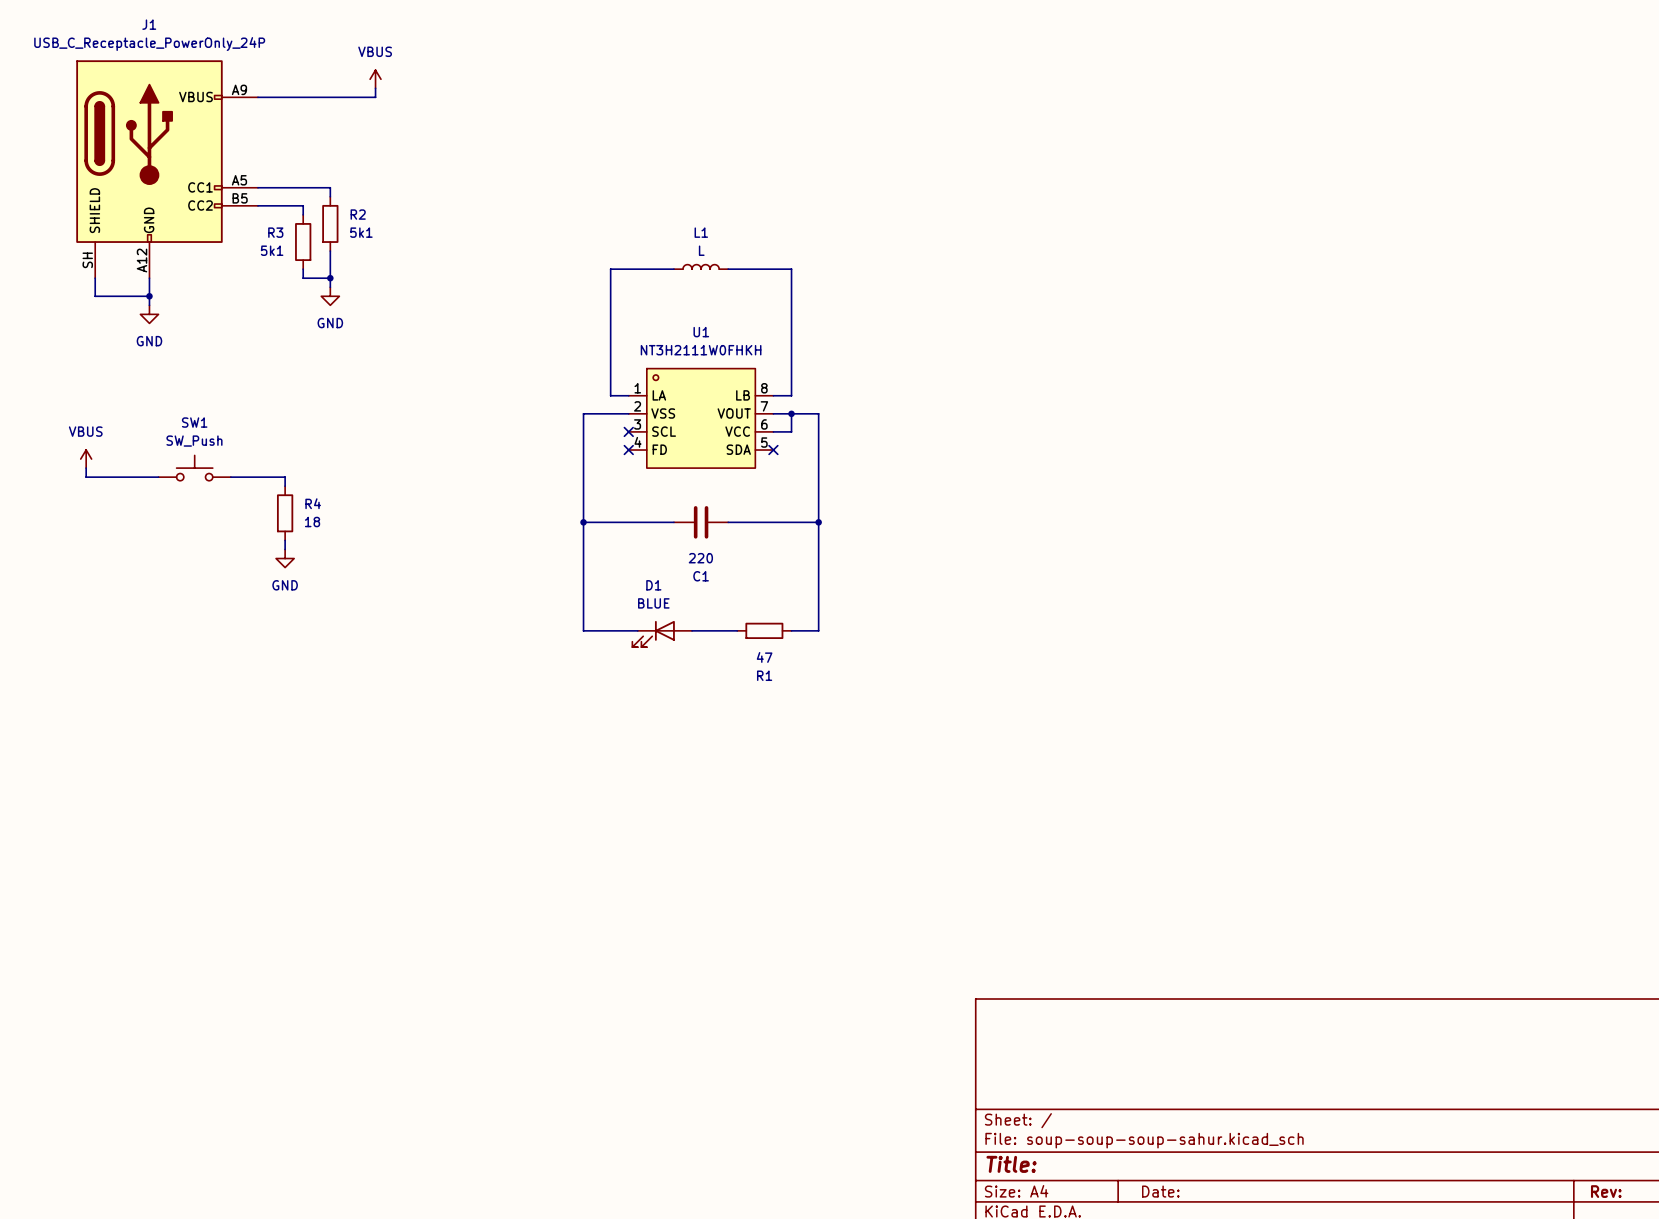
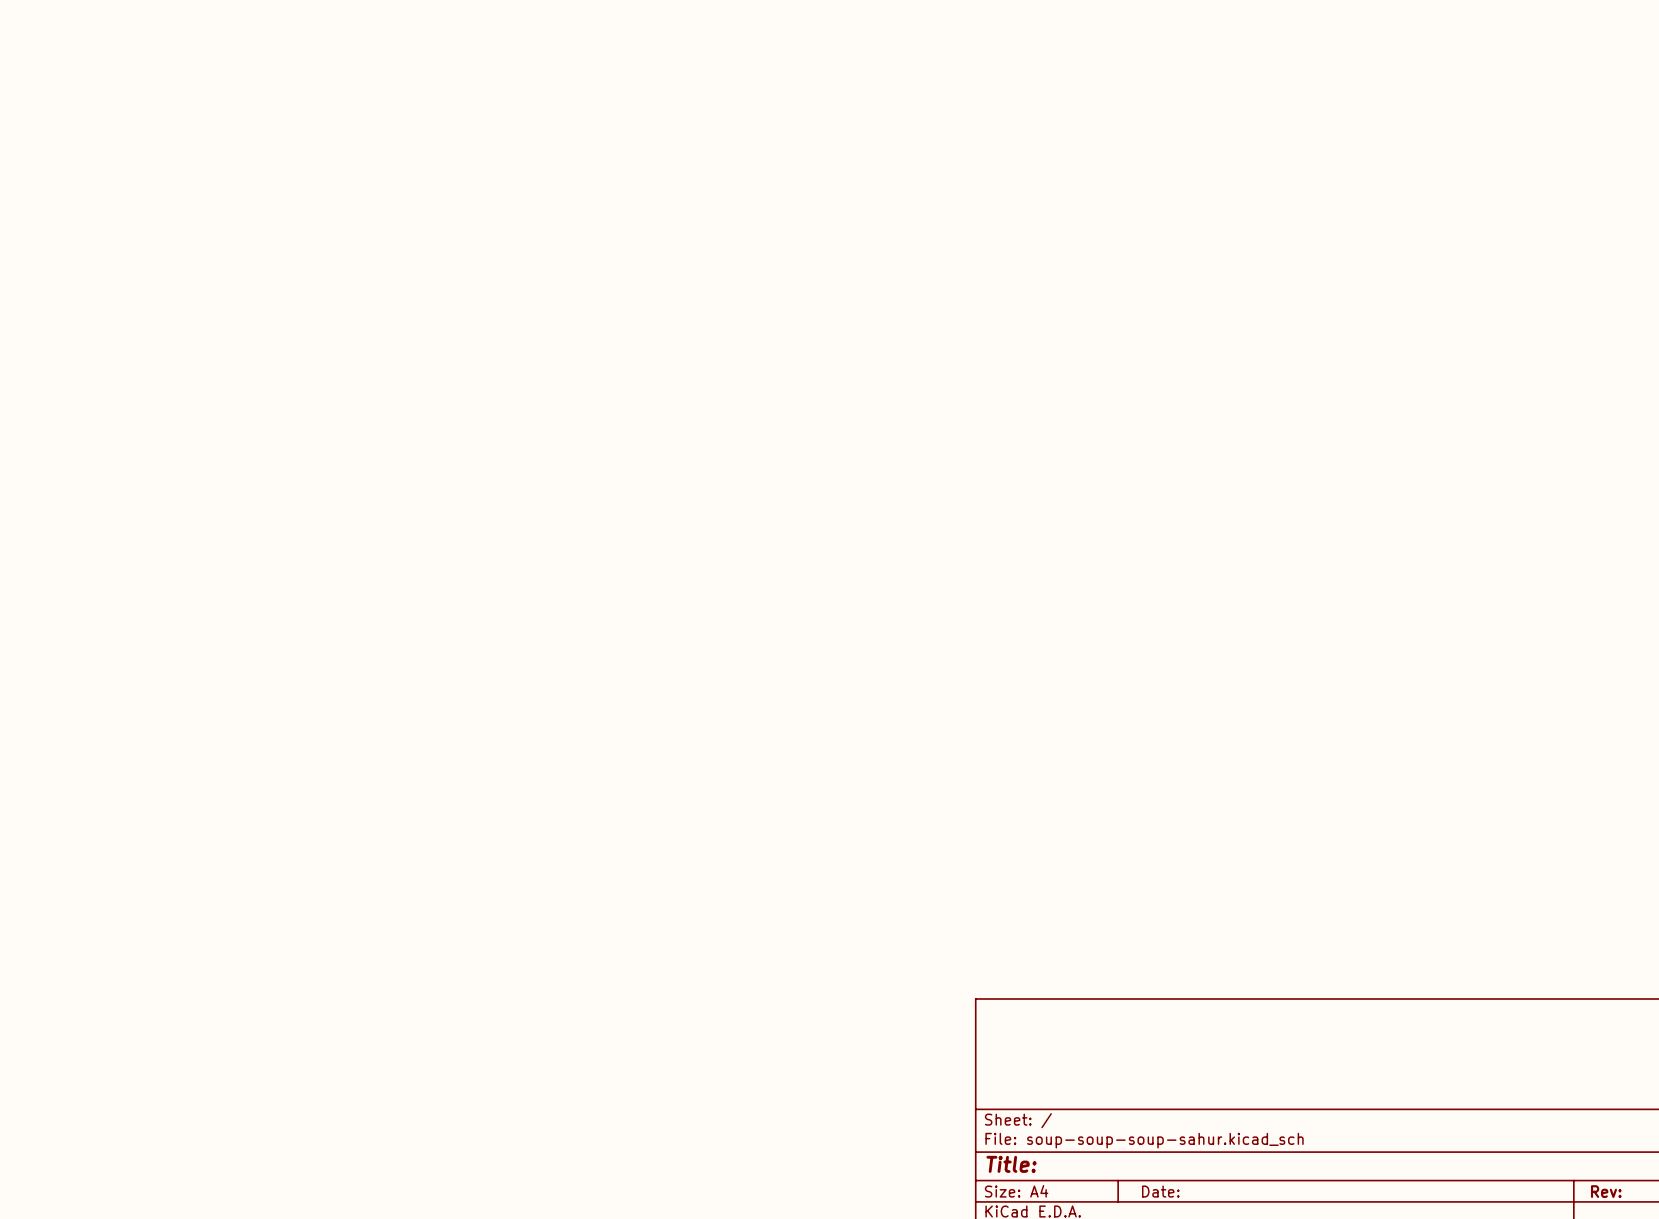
power symbol: VBUS (375, 79) -> none
wire: (375, 88) (375, 97) (257, 97) -> none
J1: USB_C_Receptacle_PowerOnly_24P (167, 169) -> none
wire: (257, 187) (330, 187) (330, 196) -> none
wire: (257, 205) (303, 205) (303, 214) -> none
R2: 5k1 (330, 223) -> none
R3: 5k1 (303, 242) -> none
wire: (330, 251) (330, 287) -> none
L1: L (701, 266) -> none
wire: (303, 269) (303, 278) (330, 278) -> none
wire: (673, 269) (610, 269) (610, 395) (628, 395) -> none
wire: (728, 269) (791, 269) (791, 395) (773, 395) -> none
wire: (95, 278) (95, 296) (149, 296) -> none
wire: (149, 278) (149, 305) -> none
junction: (330, 278) -> none
junction: (149, 296) -> none
power symbol: GND (330, 296) -> none
power symbol: GND (149, 314) -> none
wire: (628, 413) (583, 413) (583, 630) (637, 630) -> none
wire: (773, 413) (818, 413) (818, 630) (791, 630) -> none
wire: (791, 413) (791, 431) (773, 431) -> none
junction: (791, 413) -> none
U1: NT3H2111W0FHKH (701, 418) -> none
no-connect mark: (628, 431) -> none
no-connect mark: (628, 450) -> none
no-connect mark: (773, 450) -> none
power symbol: VBUS (86, 459) -> none
wire: (86, 468) (86, 477) (158, 477) -> none
SW1: SW_Push (194, 468) -> none
wire: (230, 477) (285, 477) (285, 486) -> none
R4: 18 (285, 513) -> none
wire: (583, 522) (673, 522) -> none
junction: (583, 522) -> none
C1: 220 (701, 522) -> none
wire: (728, 522) (818, 522) -> none
junction: (818, 522) -> none
wire: (285, 540) (285, 549) -> none
power symbol: GND (285, 558) -> none
wire: (692, 630) (737, 630) -> none
R1: 47 (764, 630) -> none
D1: BLUE (662, 634) -> none

